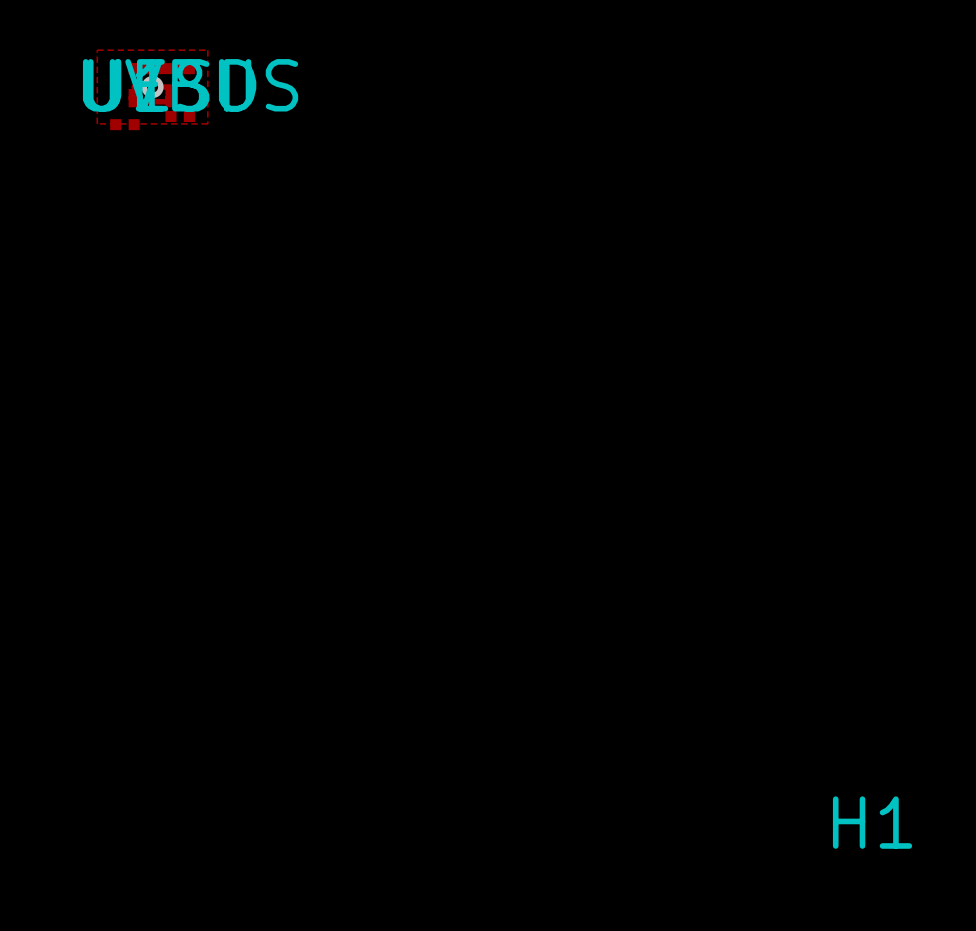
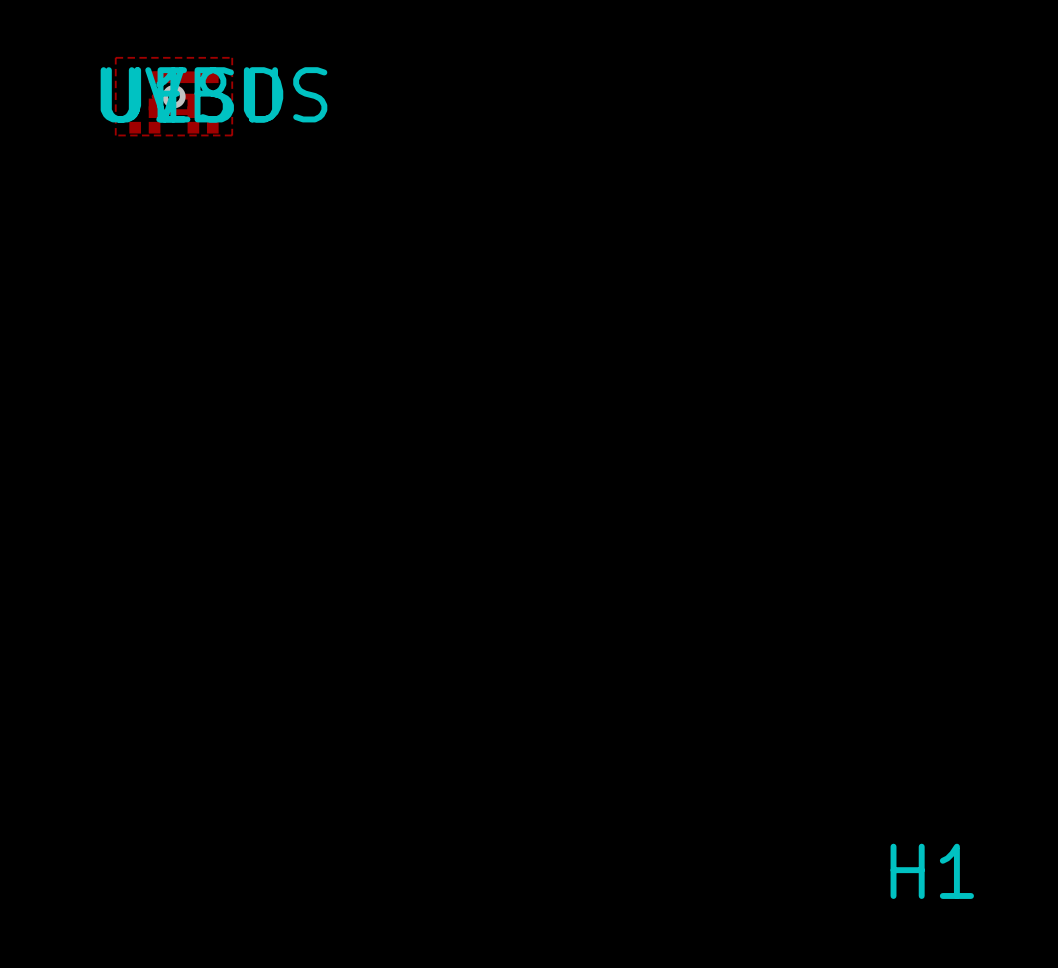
part footprint: [110, 63, 140, 131] -> [129, 71, 161, 134]

